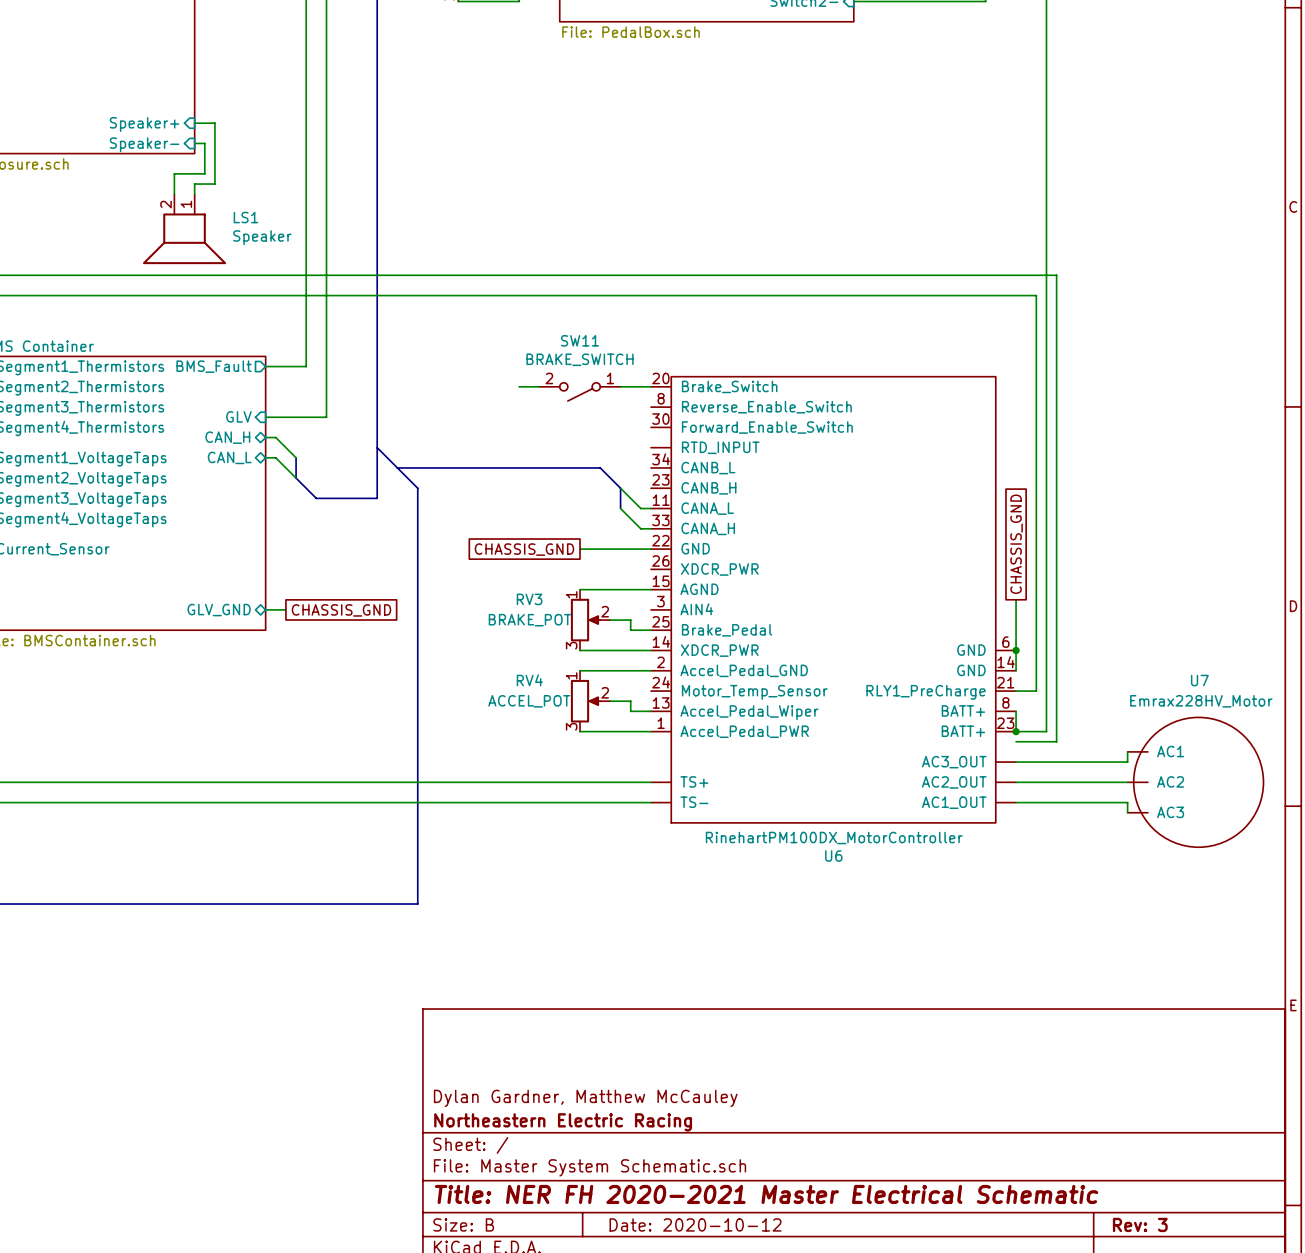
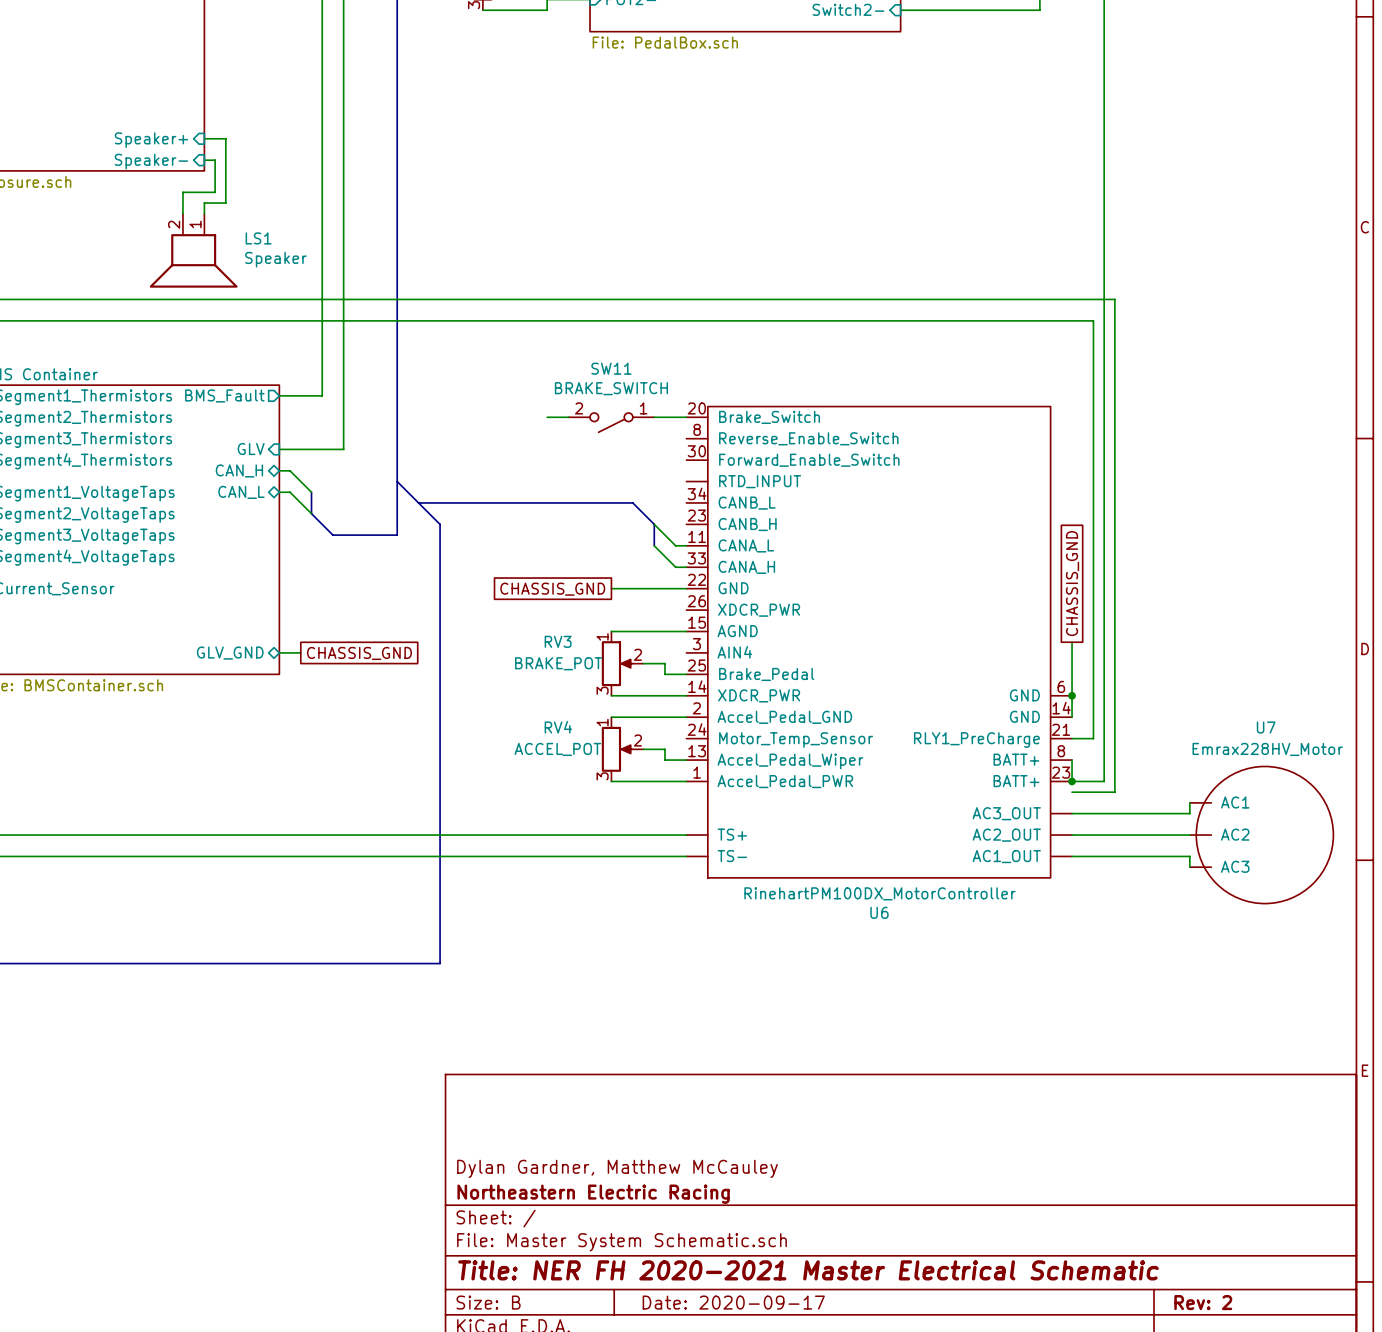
title block: Date: 2020-10-12 (695, 1224) -> Date: 2020-09-17 (733, 1302)
title block: Rev: 3 (1140, 1224) -> Rev: 2 (1203, 1302)

